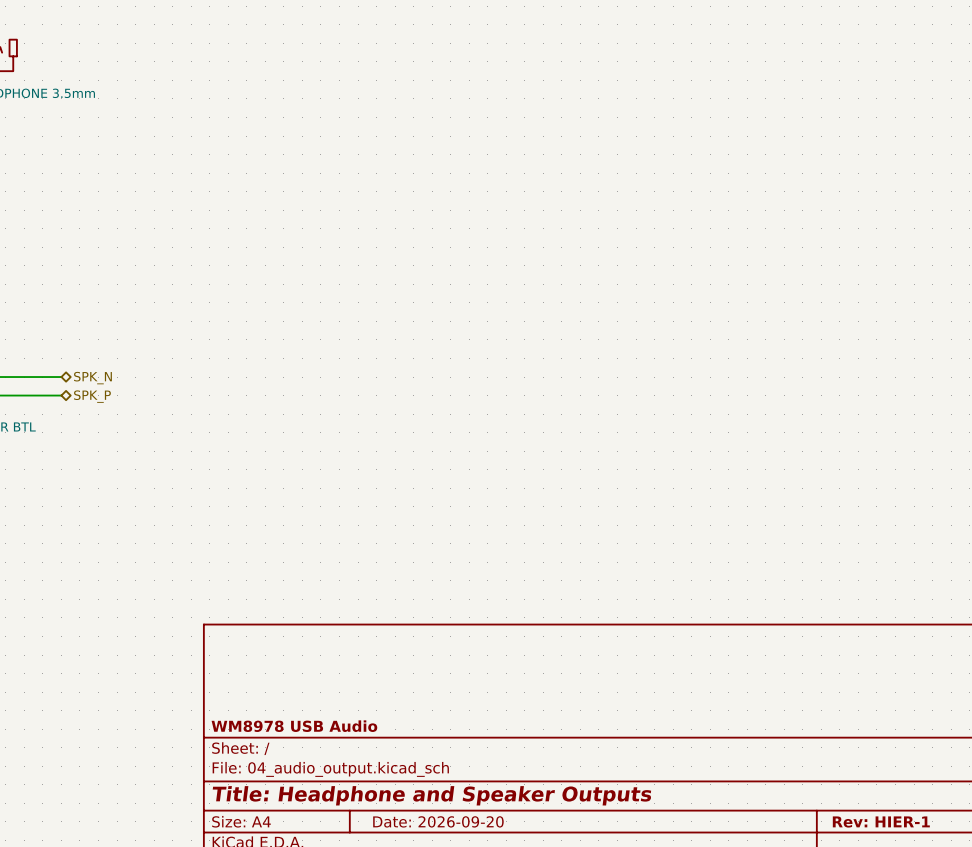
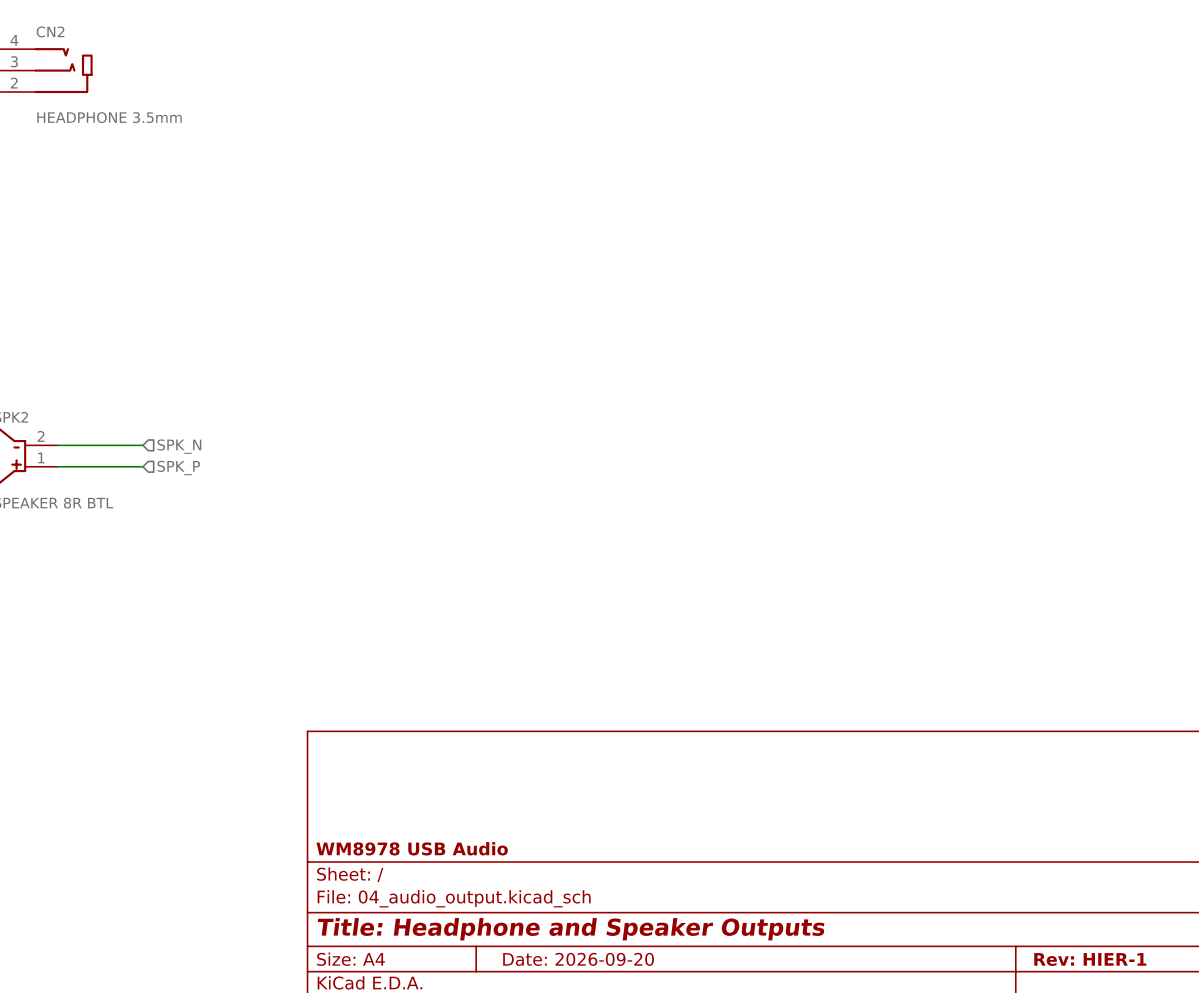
hierarchical label shape: bidirectional (92, 378) -> input (179, 446)
hierarchical label shape: bidirectional (92, 396) -> input (178, 468)

